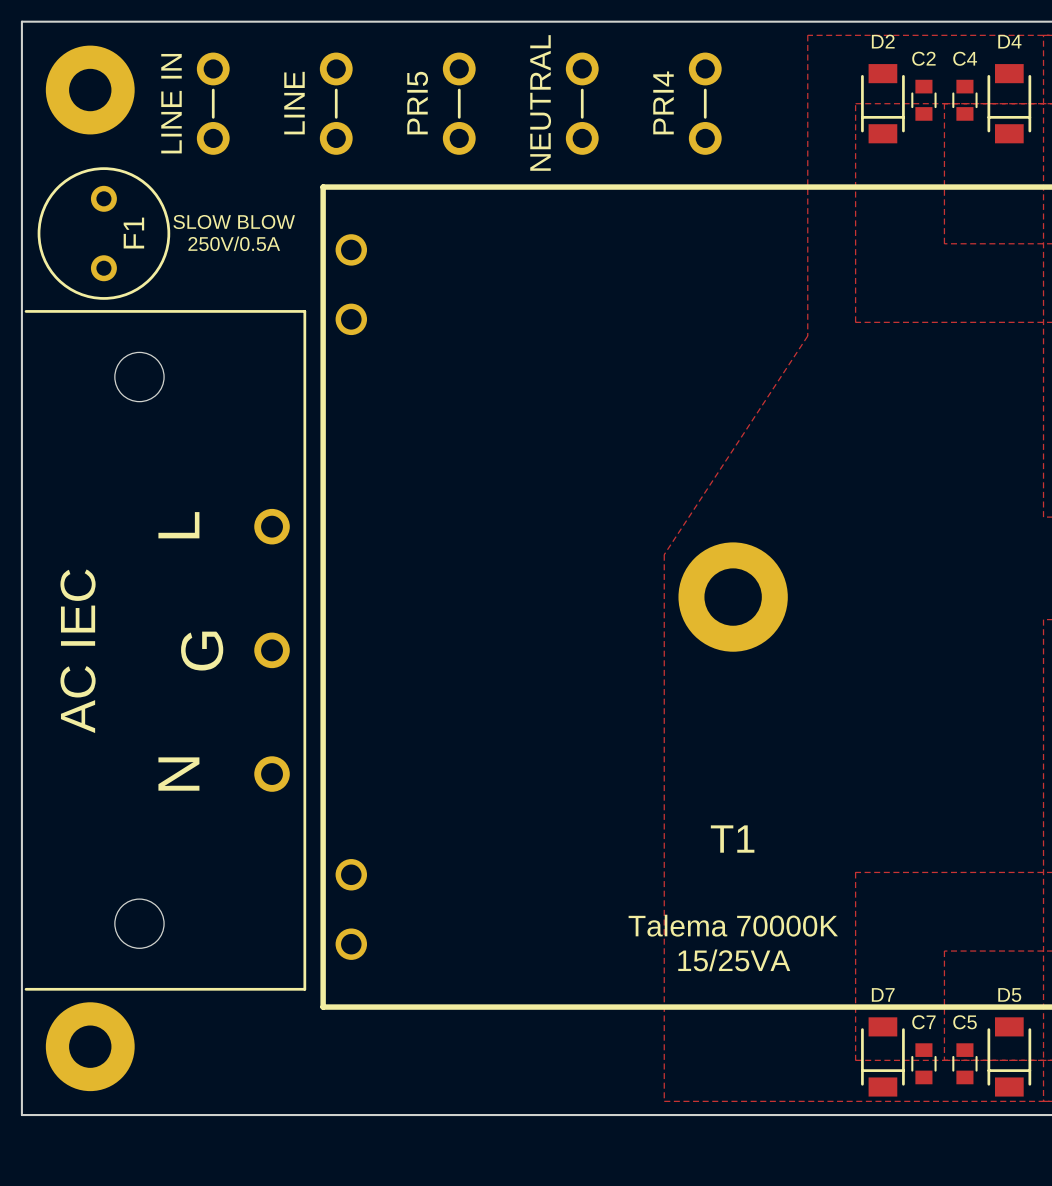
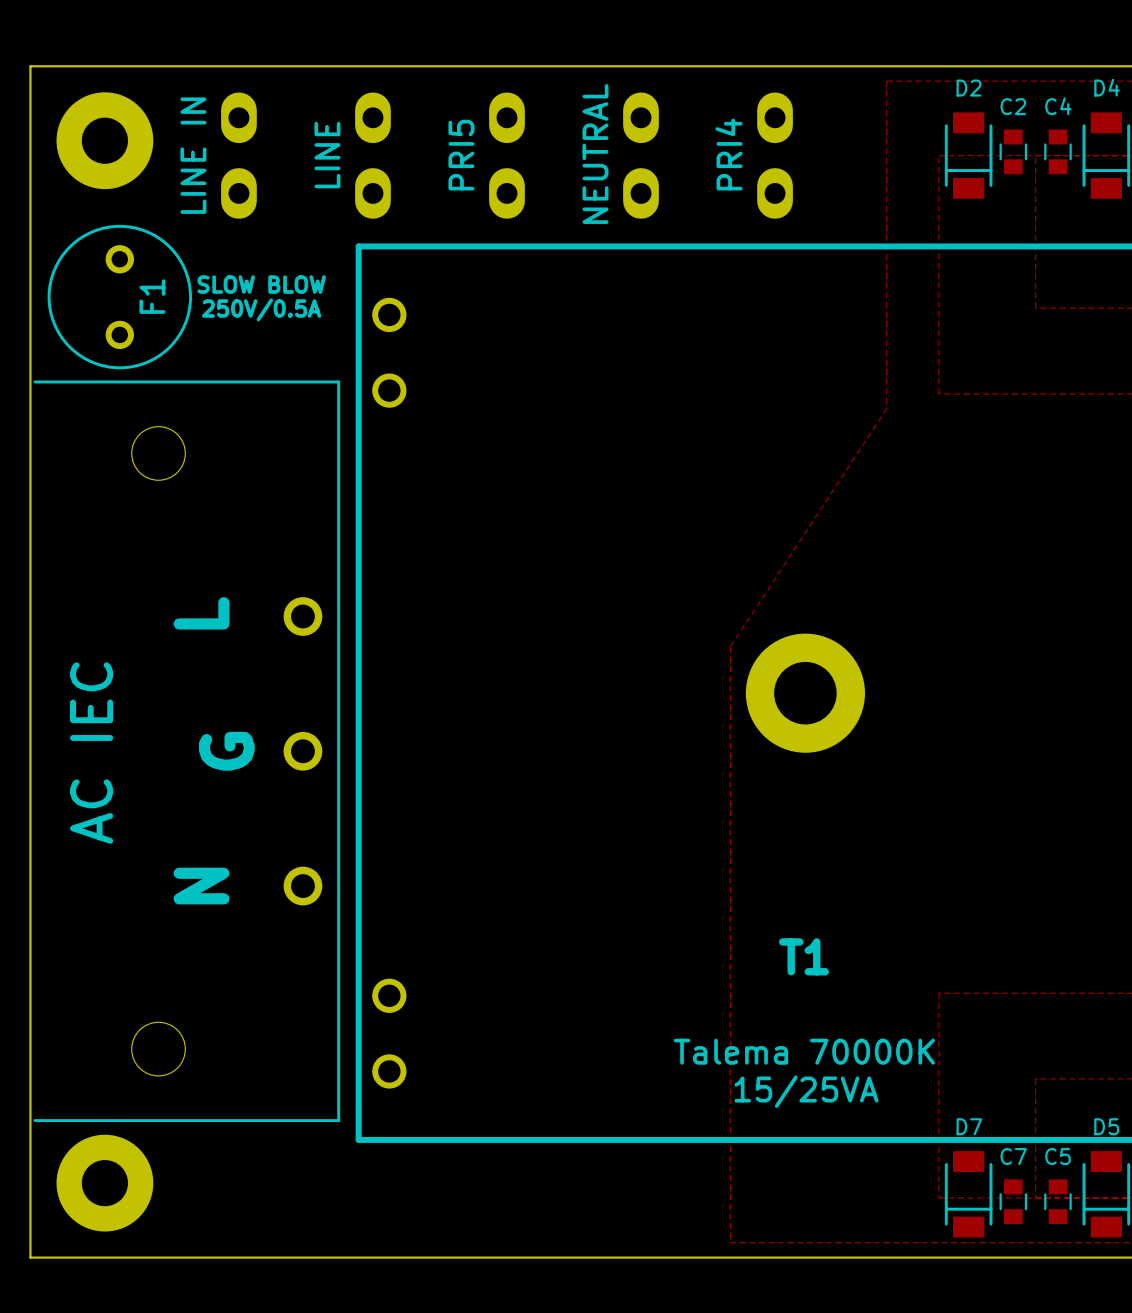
LINE IN footprint: [196, 52, 230, 155] -> [221, 92, 257, 219]
LINE footprint: [319, 52, 353, 155] -> [355, 92, 391, 219]
PRI5 footprint: [442, 52, 476, 155] -> [489, 92, 525, 219]
NEUTRAL footprint: [565, 52, 599, 155] -> [623, 92, 659, 219]
PRI4 footprint: [688, 52, 722, 155] -> [757, 92, 793, 219]

